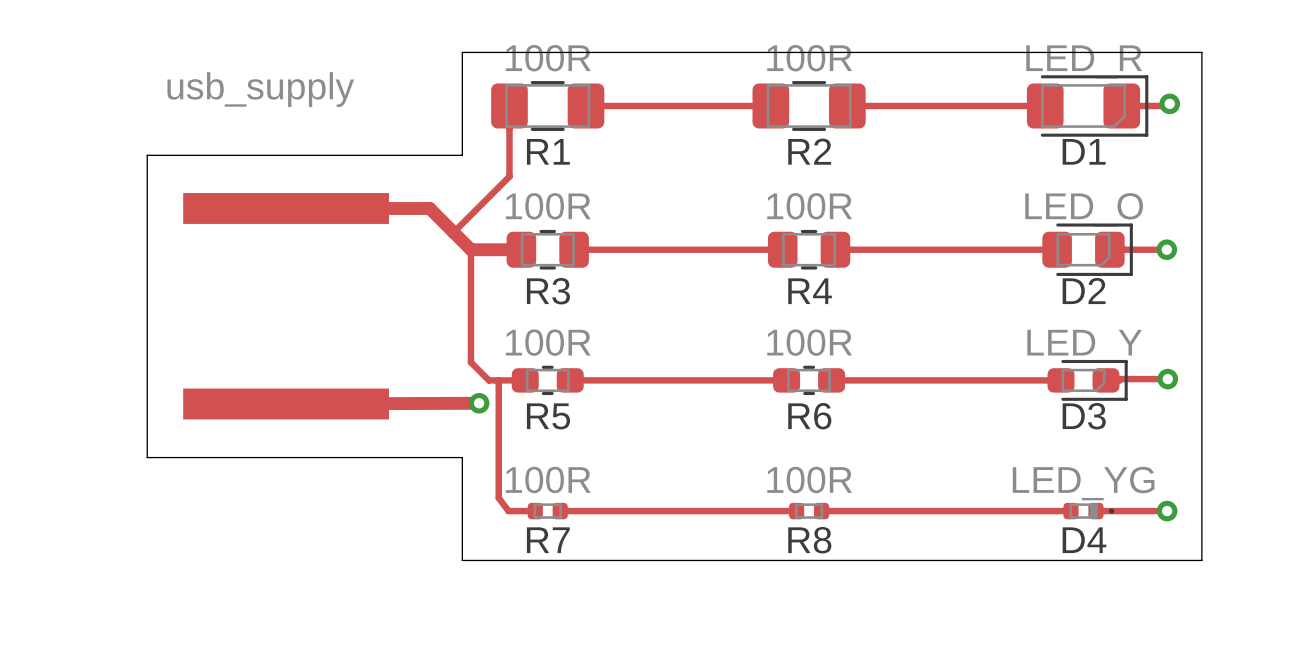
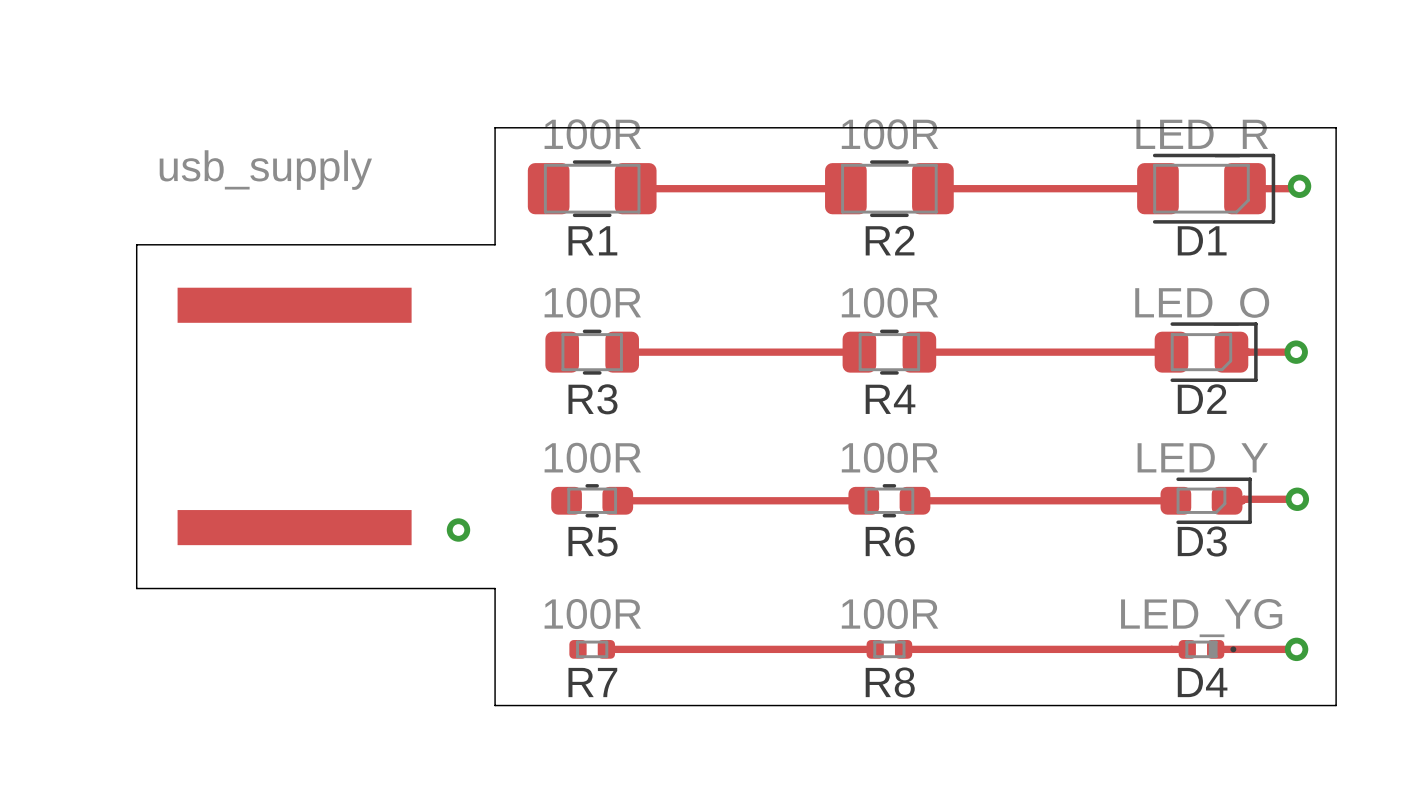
track: (509, 105) (509, 176) -> none
track: (509, 176) (453, 232) -> none
track: (286, 208) (429, 208) (470, 249) -> none
track: (470, 249) (521, 249) -> none
track: (470, 249) (470, 362) (488, 380) (525, 380) -> none
track: (498, 380) (498, 498) (508, 511) (535, 511) -> none
track: (479, 403) (286, 403) -> none
via position: (479, 403) -> (458, 530)

